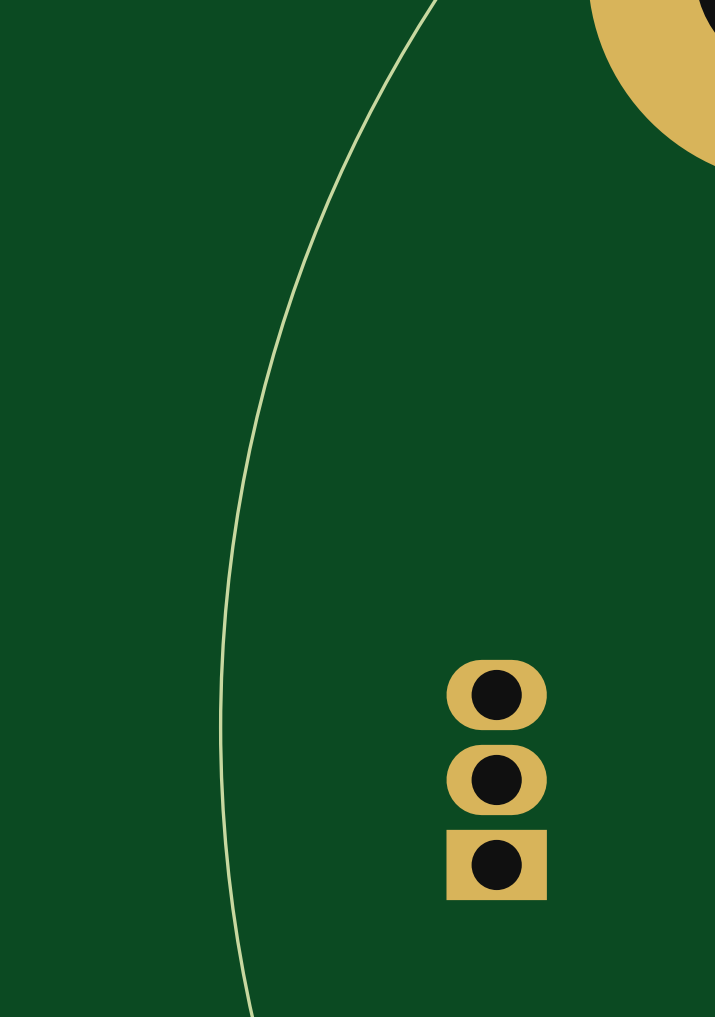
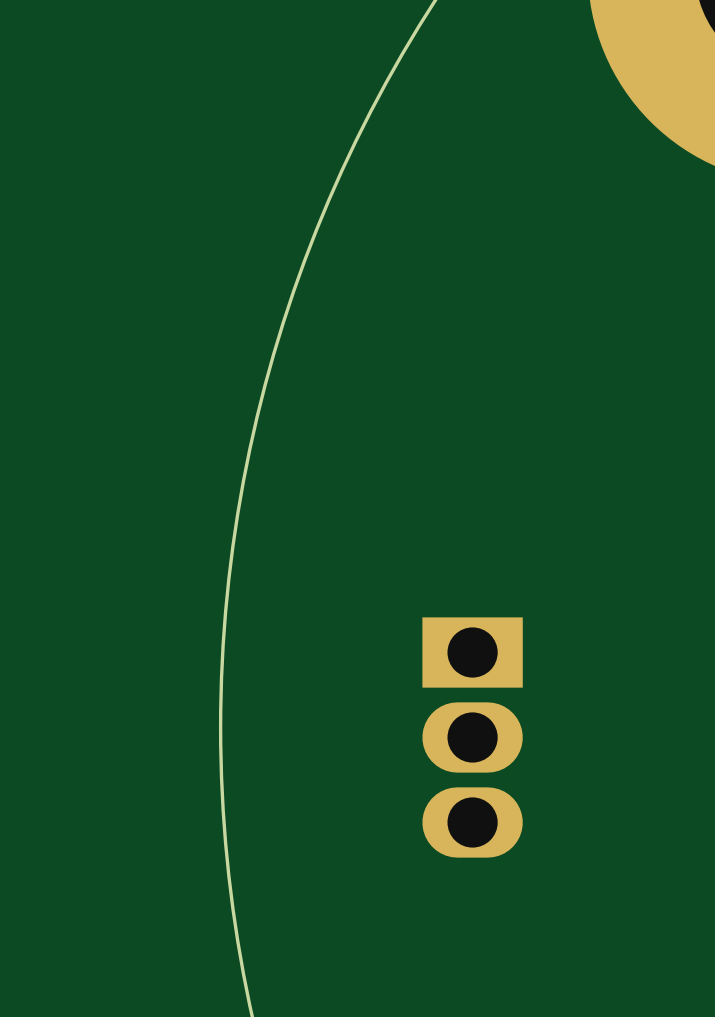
part rotation: 0° (496, 779) -> 180° (472, 737)

